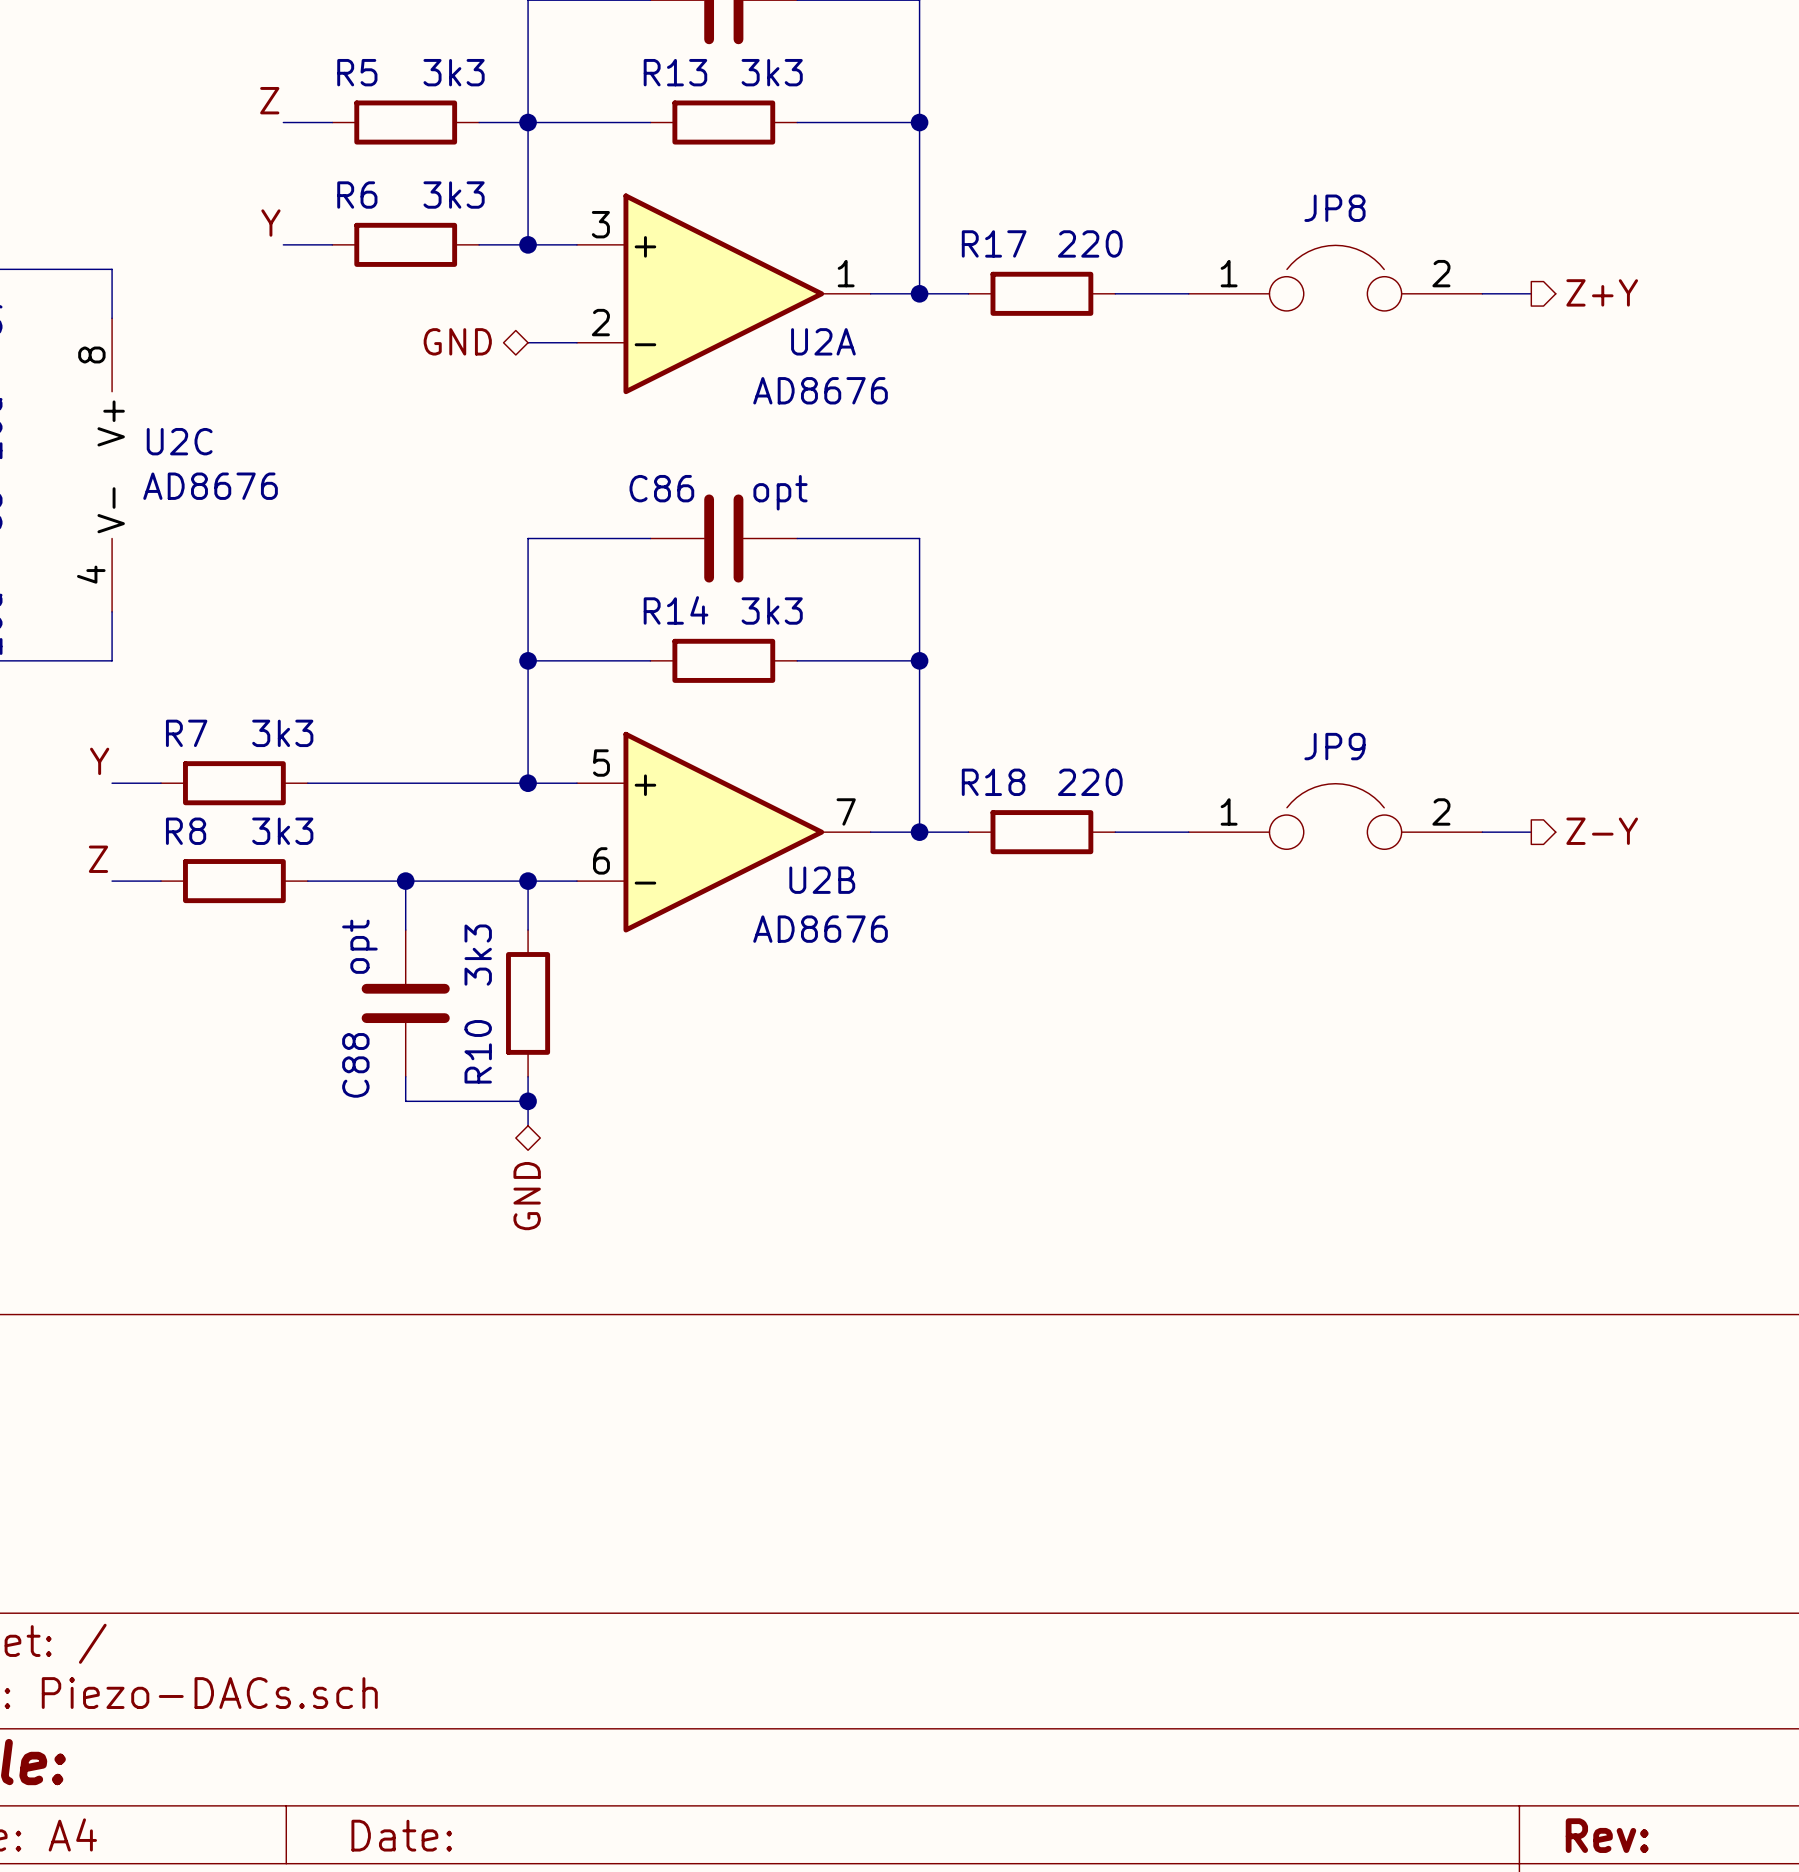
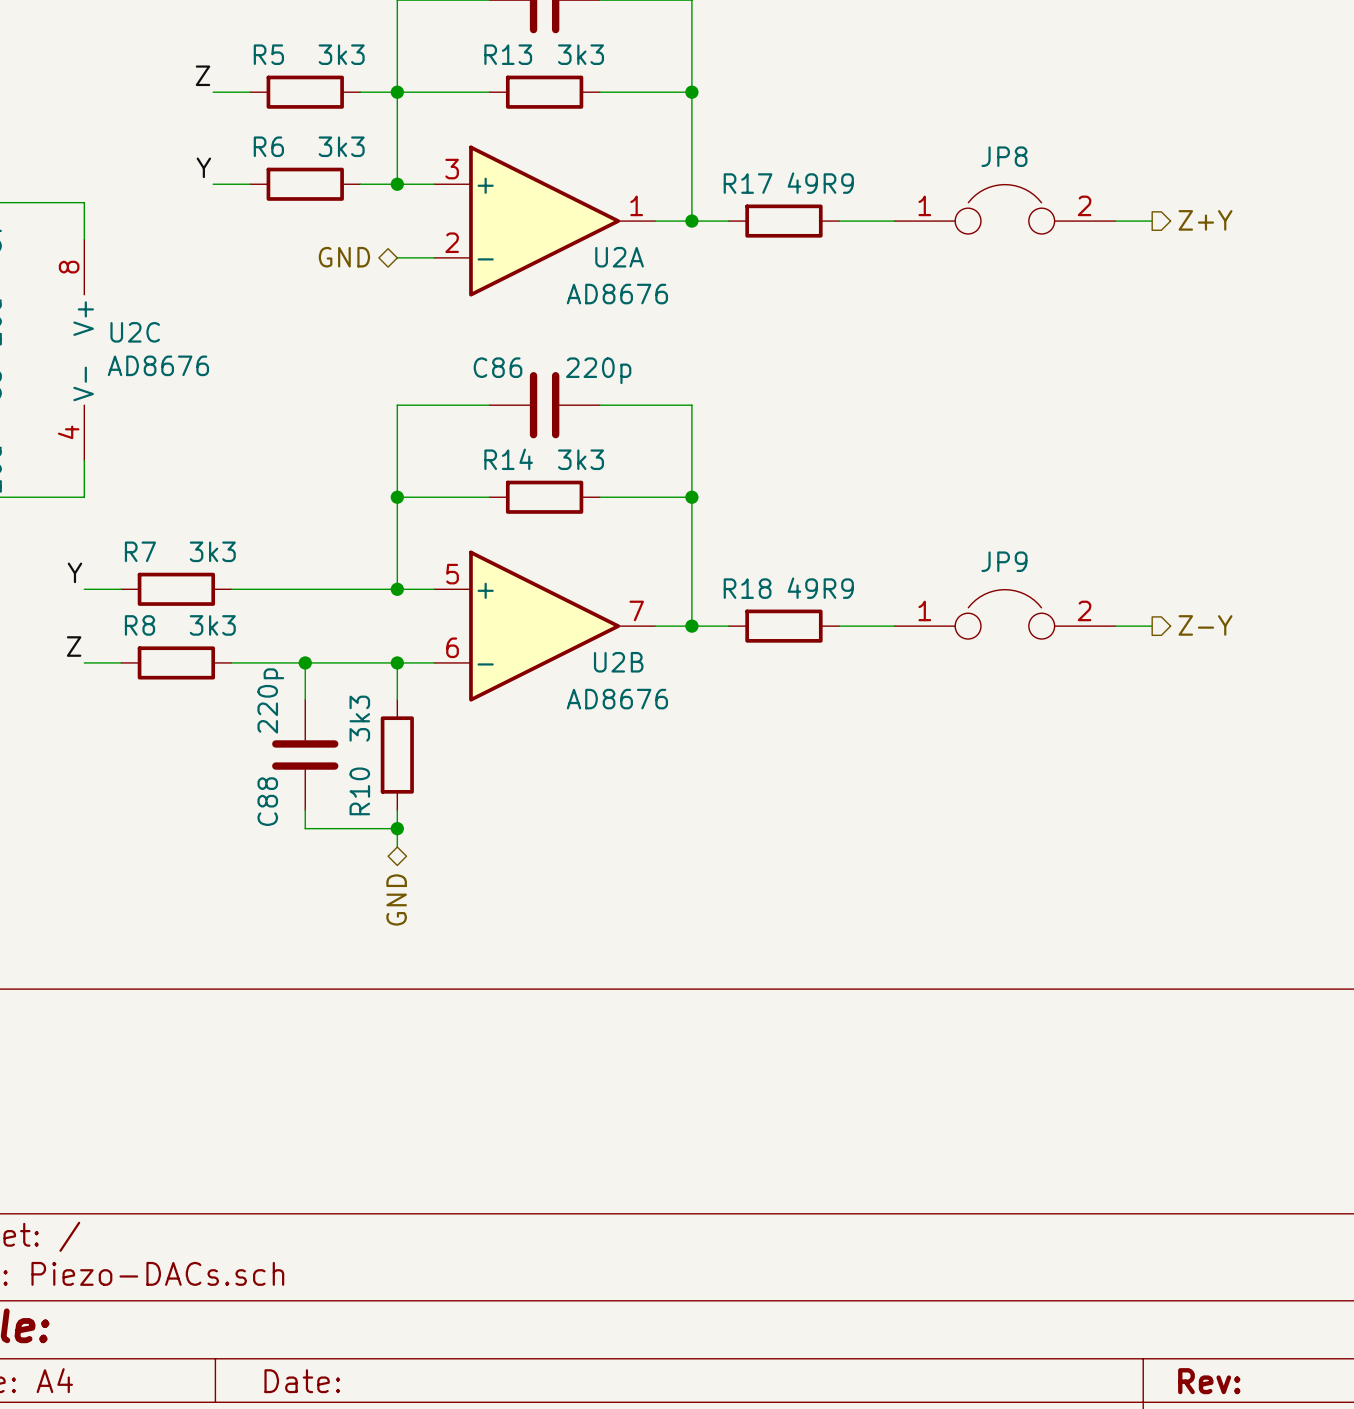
R17 value: 220 (1090, 243) -> 49R9 (820, 183)
C86 value: opt (780, 492) -> 220p (598, 370)
R18 value: 220 (1090, 782) -> 49R9 (820, 588)
C88 value: opt (359, 946) -> 220p (270, 700)

